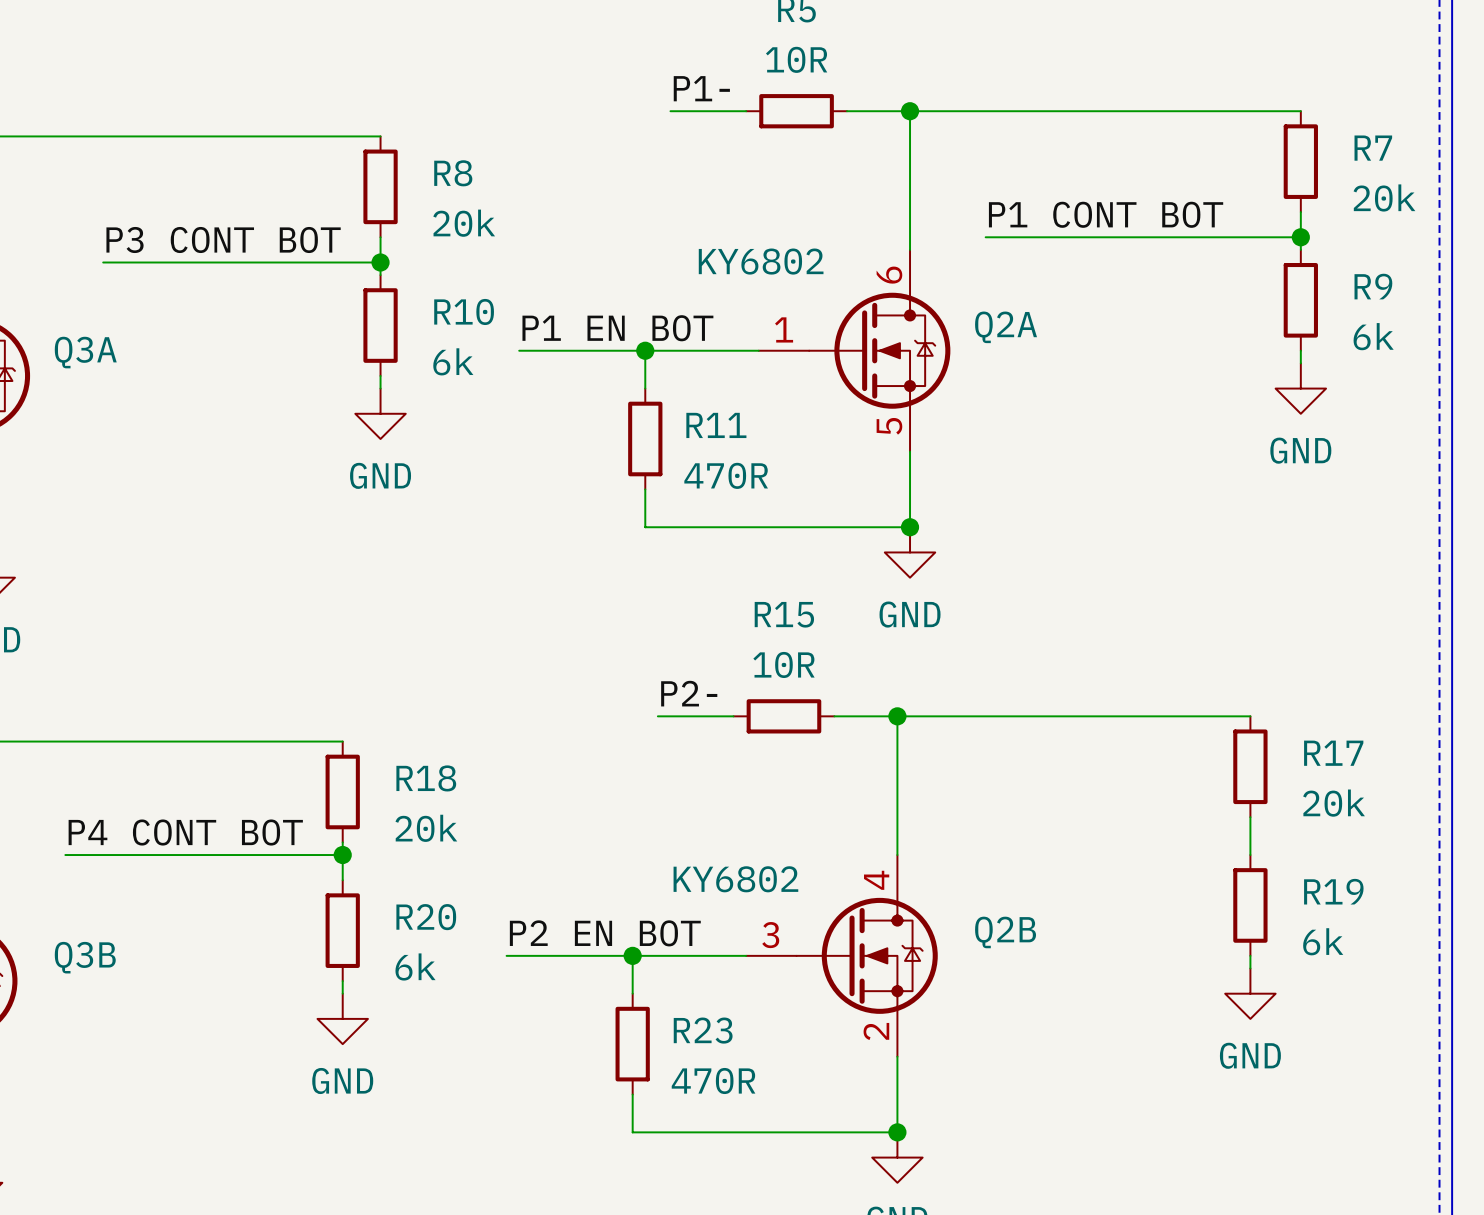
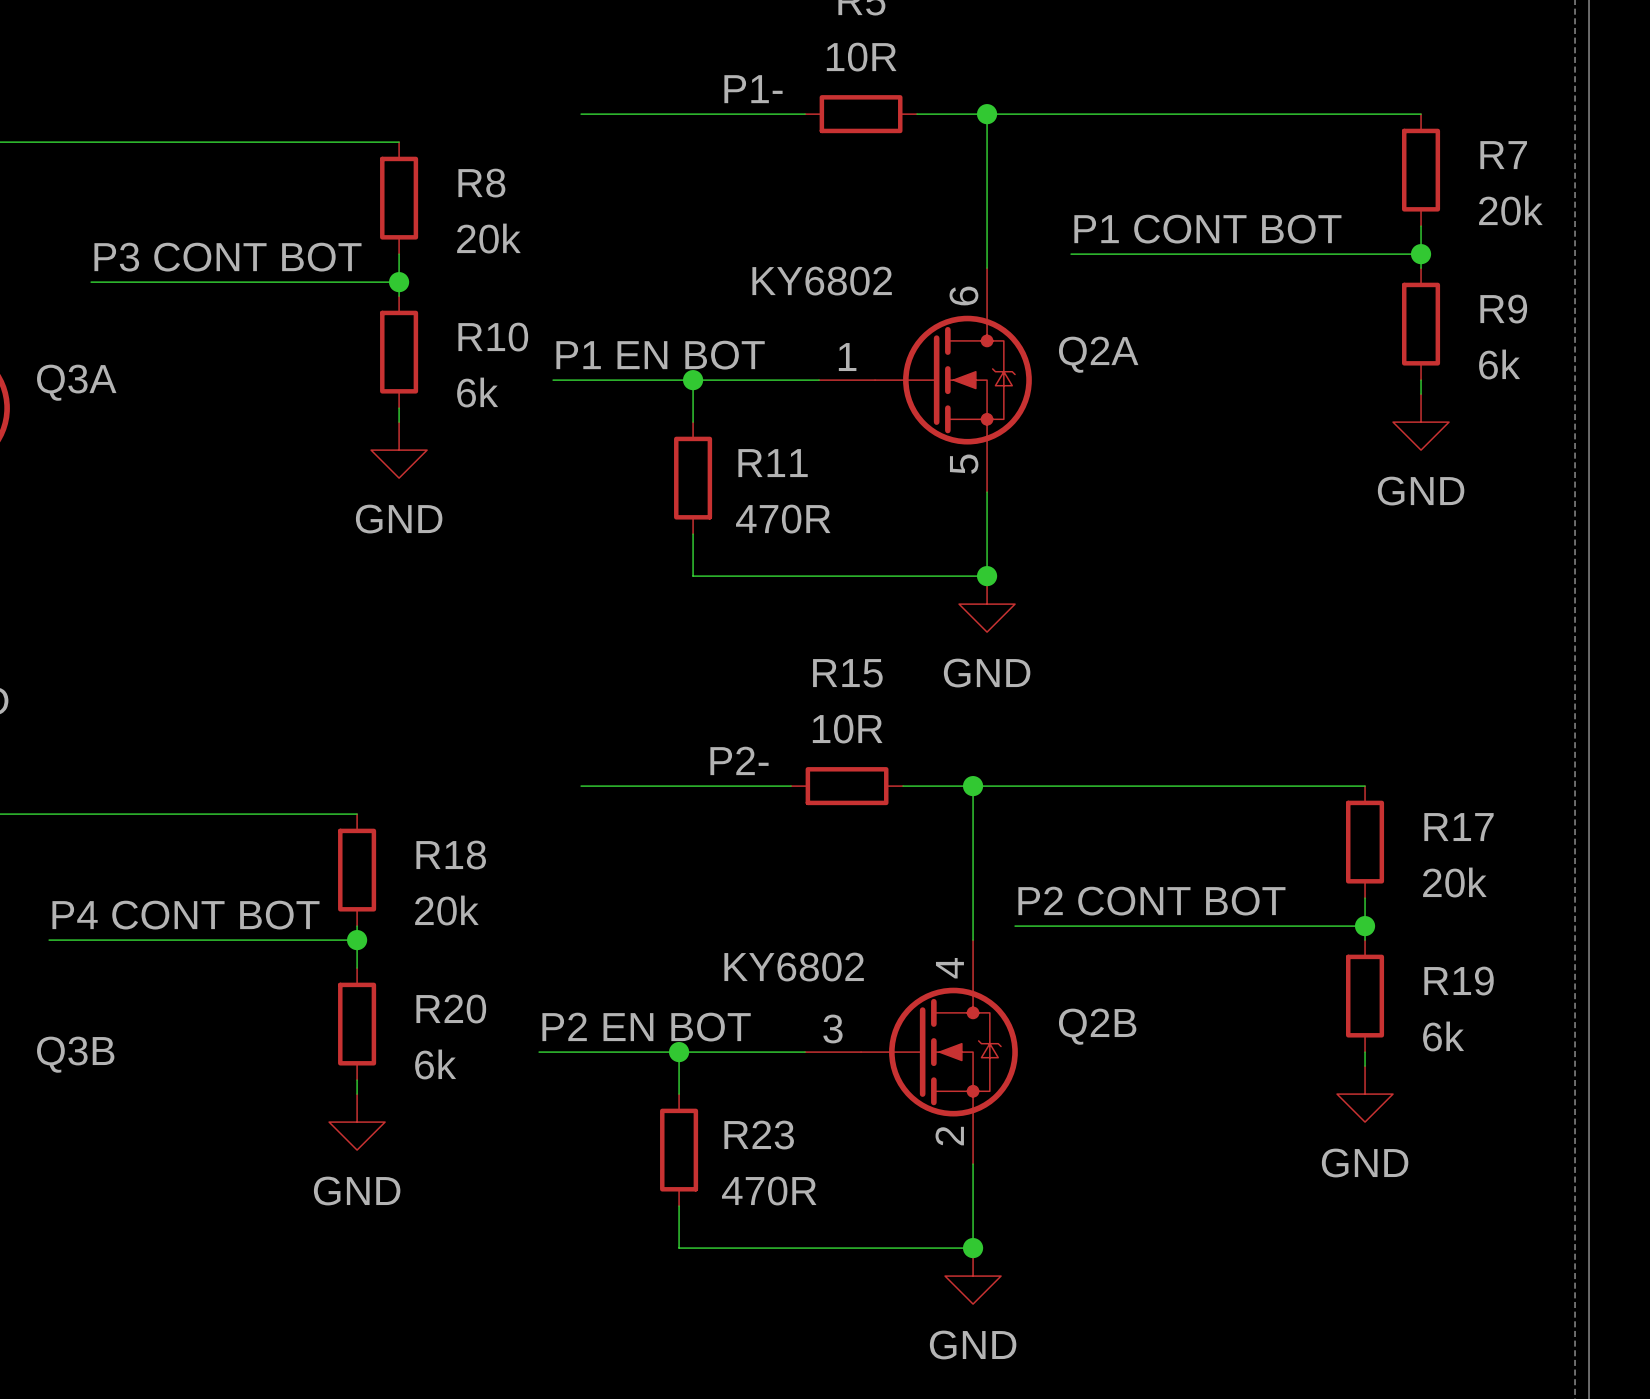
wire: none -> (581, 114) (721, 114)
wire: none -> (581, 786) (707, 786)
label: none -> P2 CONT BOT (1151, 901)
wire: none -> (1015, 926) (1365, 926)
junction: none -> (1365, 926)

